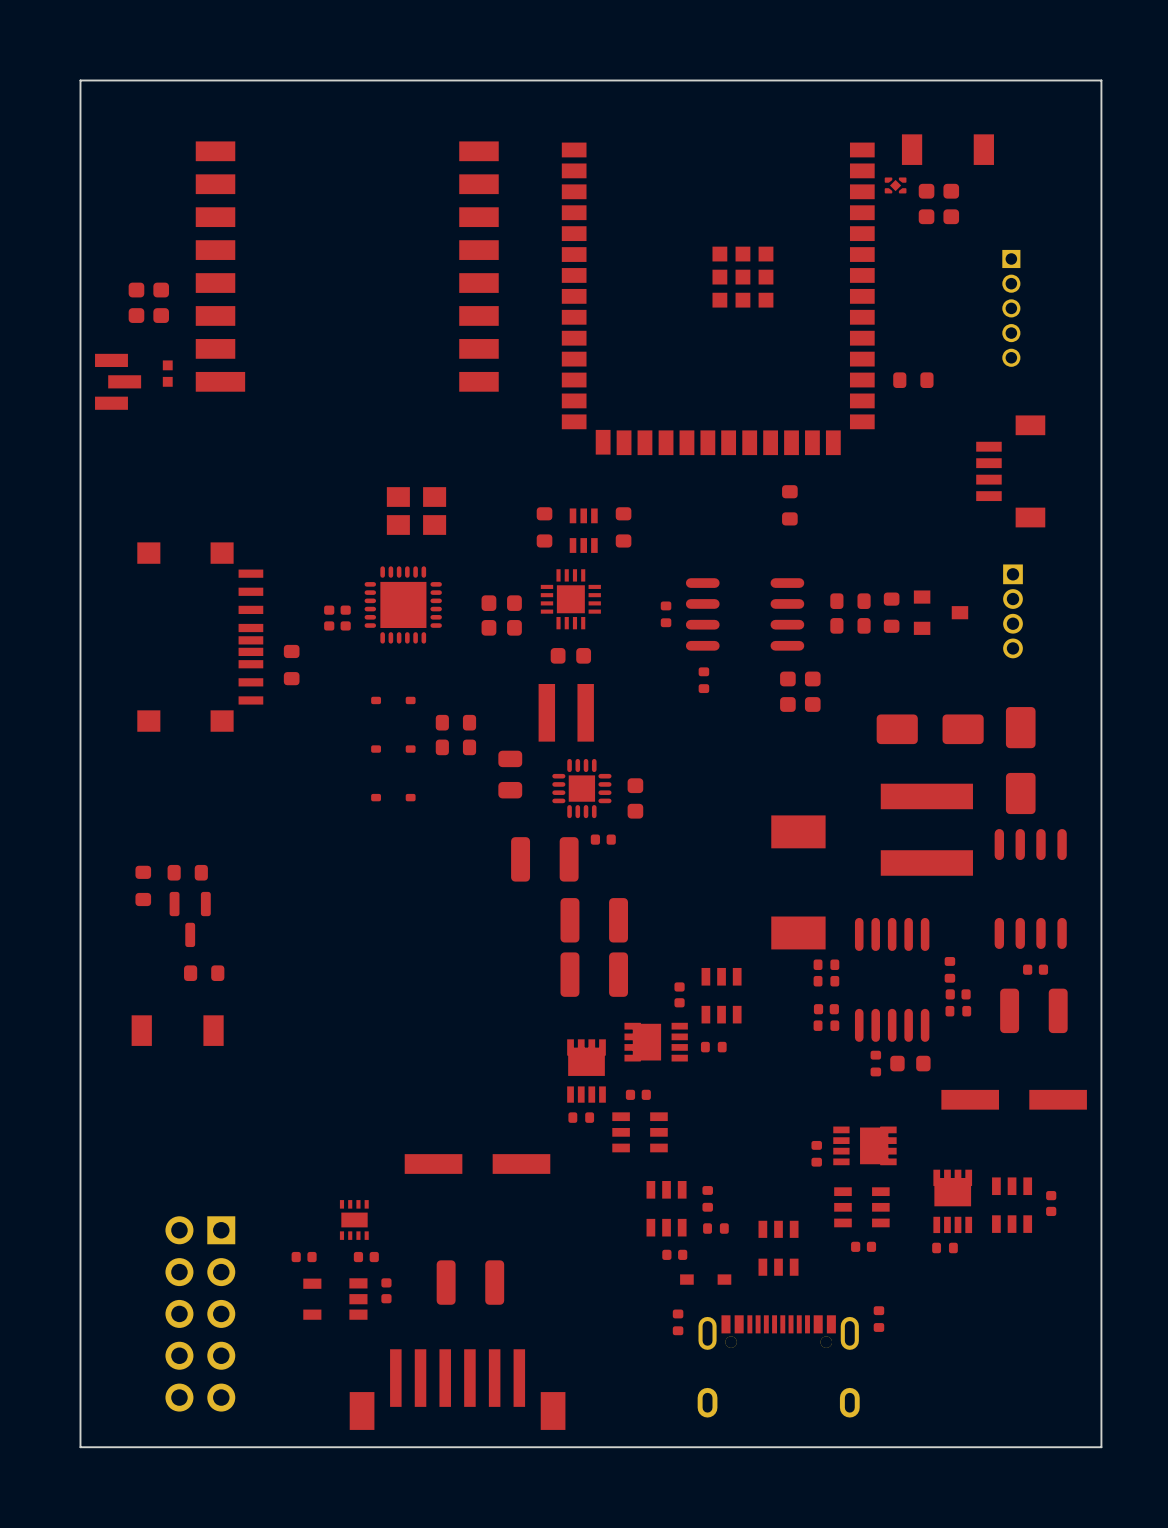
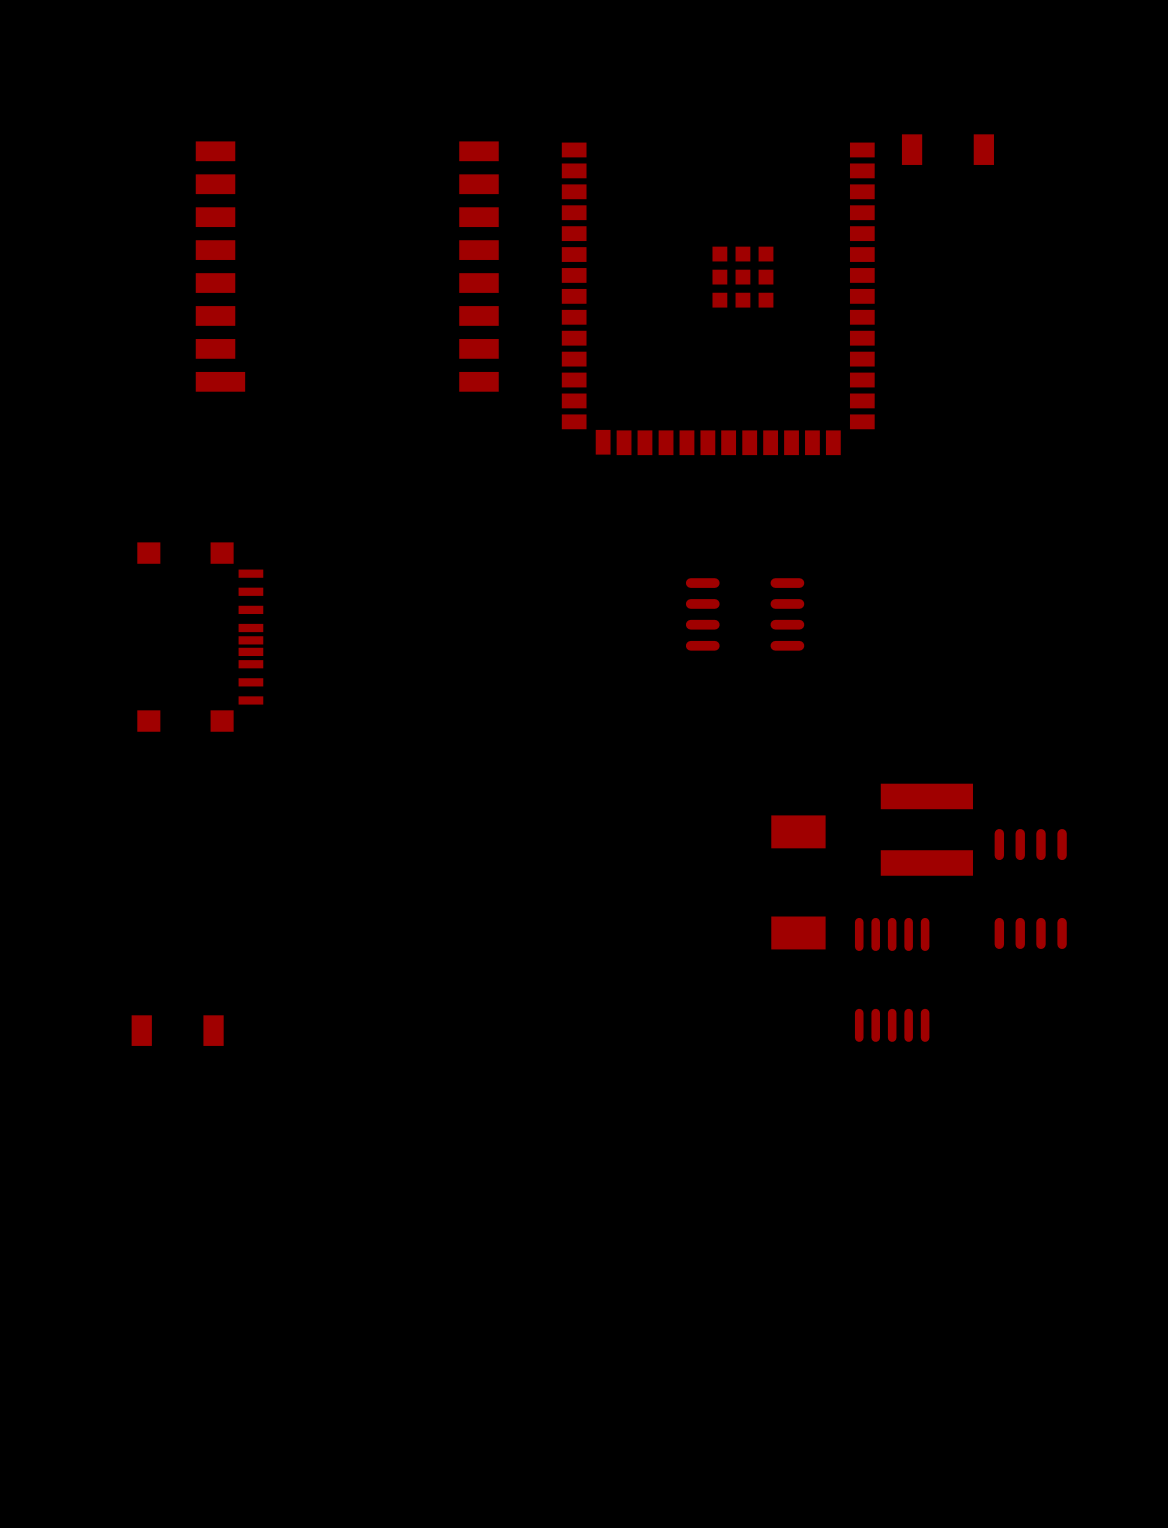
board edge: (1101, 80) (80, 80) (80, 1447) (1101, 1447) (1101, 80) -> none
part: (895, 185) -> none
part: (926, 203) -> none
part: (951, 203) -> none
part: (136, 302) -> none
part: (161, 302) -> none
part: (1011, 308) -> none
part: (167, 373) -> none
part: (913, 380) -> none
part: (118, 381) -> none
part: (1010, 471) -> none
part: (789, 505) -> none
part: (416, 511) -> none
part: (544, 527) -> none
part: (623, 527) -> none
part: (583, 530) -> none
part: (570, 599) -> none
part: (850, 601) -> none
part: (501, 603) -> none
part: (403, 604) -> none
part: (1013, 611) -> none
part: (891, 612) -> none
part: (941, 612) -> none
part: (666, 614) -> none
part: (329, 618) -> none
part: (345, 618) -> none
part: (850, 625) -> none
part: (501, 627) -> none
part: (570, 655) -> none
part: (291, 665) -> none
part: (703, 680) -> none
part: (787, 691) -> none
part: (812, 691) -> none
part: (393, 700) -> none
part: (566, 712) -> none
part: (455, 722) -> none
part: (930, 729) -> none
part: (455, 747) -> none
part: (393, 749) -> none
part: (1020, 760) -> none
part: (510, 774) -> none
part: (581, 788) -> none
part: (393, 797) -> none
part: (635, 798) -> none
part: (603, 839) -> none
part: (544, 859) -> none
part: (187, 872) -> none
part: (143, 885) -> none
part: (190, 919) -> none
part: (594, 920) -> none
part: (826, 964) -> none
part: (949, 969) -> none
part: (1035, 969) -> none
part: (204, 973) -> none
part: (594, 974) -> none
part: (826, 981) -> none
part: (679, 994) -> none
part: (958, 994) -> none
part: (721, 995) -> none
part: (826, 1009) -> none
part: (1033, 1010) -> none
part: (958, 1011) -> none
part: (826, 1025) -> none
part: (656, 1042) -> none
part: (713, 1047) -> none
part: (875, 1063) -> none
part: (910, 1063) -> none
part: (586, 1071) -> none
part: (638, 1094) -> none
part: (1014, 1099) -> none
part: (581, 1117) -> none
part: (640, 1132) -> none
part: (864, 1145) -> none
part: (816, 1153) -> none
part: (477, 1164) -> none
part: (707, 1198) -> none
part: (952, 1201) -> none
part: (1051, 1203) -> none
part: (1012, 1205) -> none
part: (861, 1207) -> none
part: (666, 1208) -> none
part: (354, 1219) -> none
part: (715, 1228) -> none
part: (863, 1246) -> none
part: (944, 1247) -> none
part: (778, 1248) -> none
part: (674, 1254) -> none
part: (304, 1257) -> none
part: (366, 1257) -> none
part: (705, 1279) -> none
part: (470, 1282) -> none
part: (386, 1290) -> none
part: (335, 1299) -> none
part: (200, 1313) -> none
part: (878, 1319) -> none
part: (678, 1322) -> none
part: (778, 1366) -> none
part: (457, 1389) -> none

